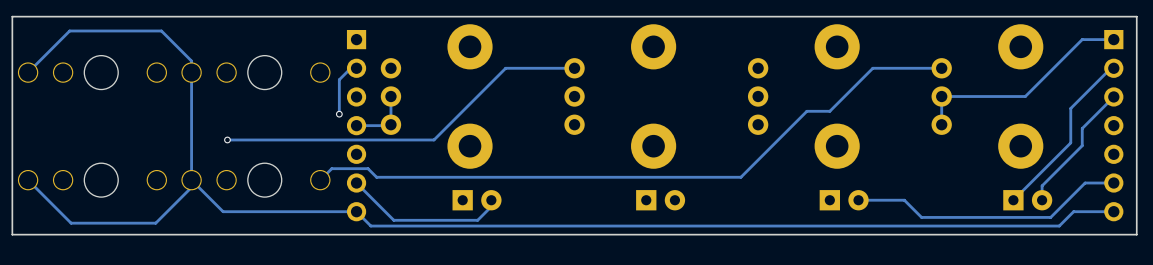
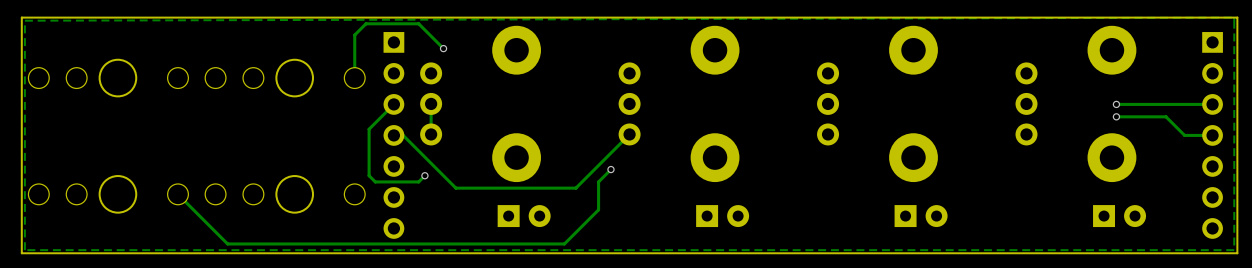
zone outline: none -> (1234, 17) (1234, 250) (24, 250) (24, 20) (1234, 17)
track: (1113, 39) (1082, 39) (1025, 96) (941, 96) (941, 124) -> none
track: none -> (443, 48) (418, 23) (366, 23) (354, 35) (354, 78)
via: none -> (443, 48)
track: (350, 68) (339, 79) (339, 114) -> none
track: (574, 68) (505, 68) (434, 139) (227, 139) -> none
track: (941, 68) (872, 68) (829, 111) (806, 111) (740, 177) (376, 177) (368, 168) -> (424, 175) (418, 181) (406, 181)
track: (1113, 68) (1110, 68) (1070, 108) (1070, 142) (1013, 200) -> none
track: (28, 72) (69, 30) (161, 30) (191, 61) (191, 187) (155, 223) (71, 223) (28, 180) -> none
via: none -> (1116, 104)
track: (1113, 96) (1082, 128) (1082, 145) (1042, 185) (1042, 200) -> (1212, 104) (1116, 104)
track: none -> (1116, 116) (1166, 116) (1184, 135) (1212, 135)
via: none -> (1116, 116)
via: (339, 114) -> none
track: (390, 125) (365, 125) -> (629, 134) (575, 188) (455, 188) (403, 135)
via: (227, 139) -> none
via: none -> (610, 169)
via: none -> (424, 175)
track: (339, 168) (331, 168) (320, 180) -> (375, 181) (369, 175) (369, 129) (393, 104)
track: (191, 180) (223, 211) (356, 211) (370, 226) -> (178, 194) (227, 243) (409, 243)
track: (356, 183) (393, 220) (477, 220) (491, 206) -> none
track: (1113, 183) (1085, 183) (1050, 217) (921, 217) (904, 200) (858, 200) -> none
track: (1113, 211) (1073, 211) (1059, 226) (514, 226) -> (610, 169) (598, 181) (598, 209) (564, 243)

